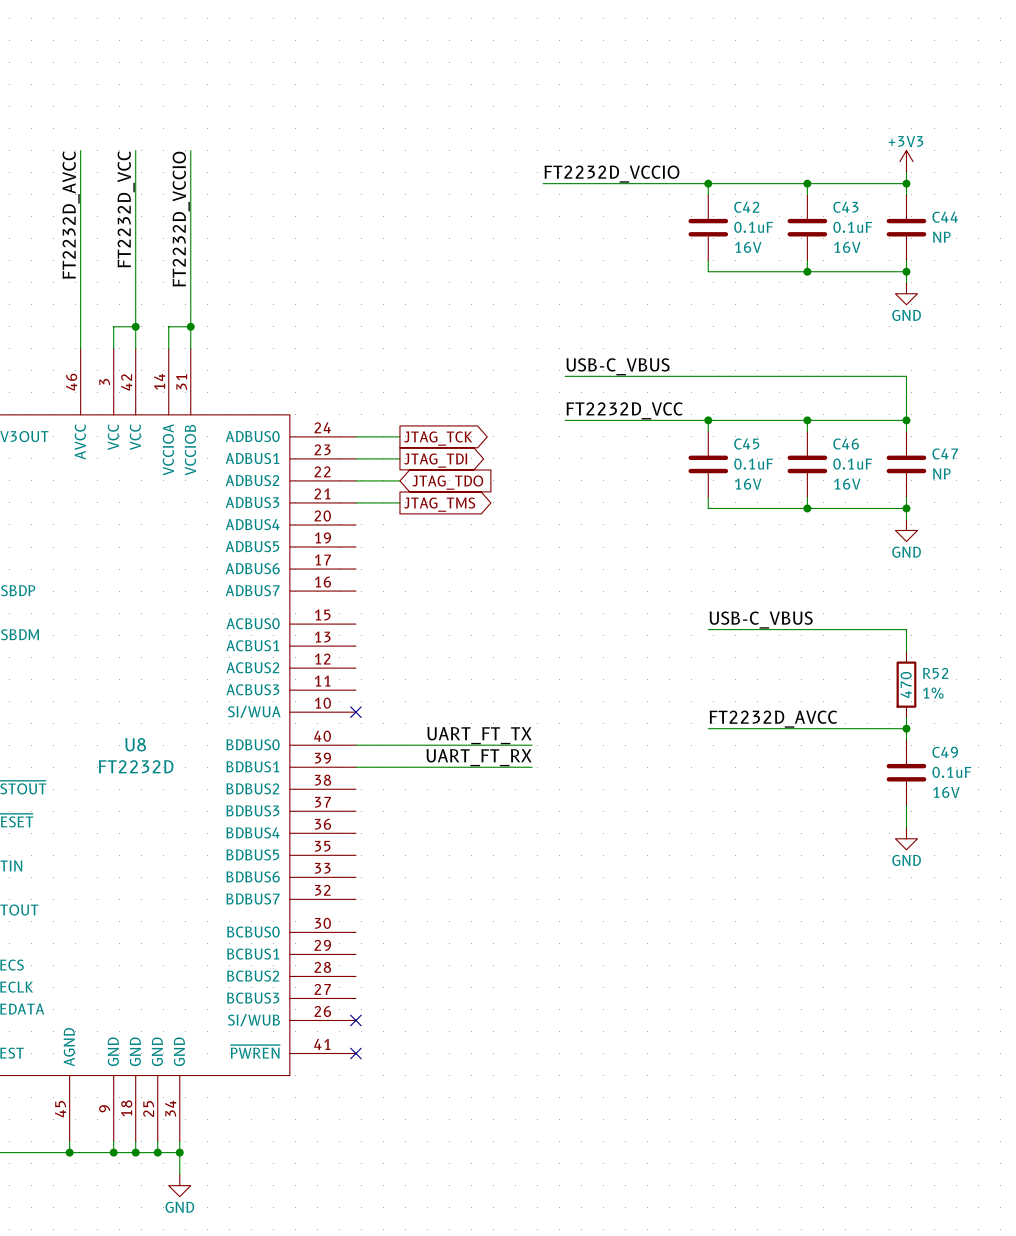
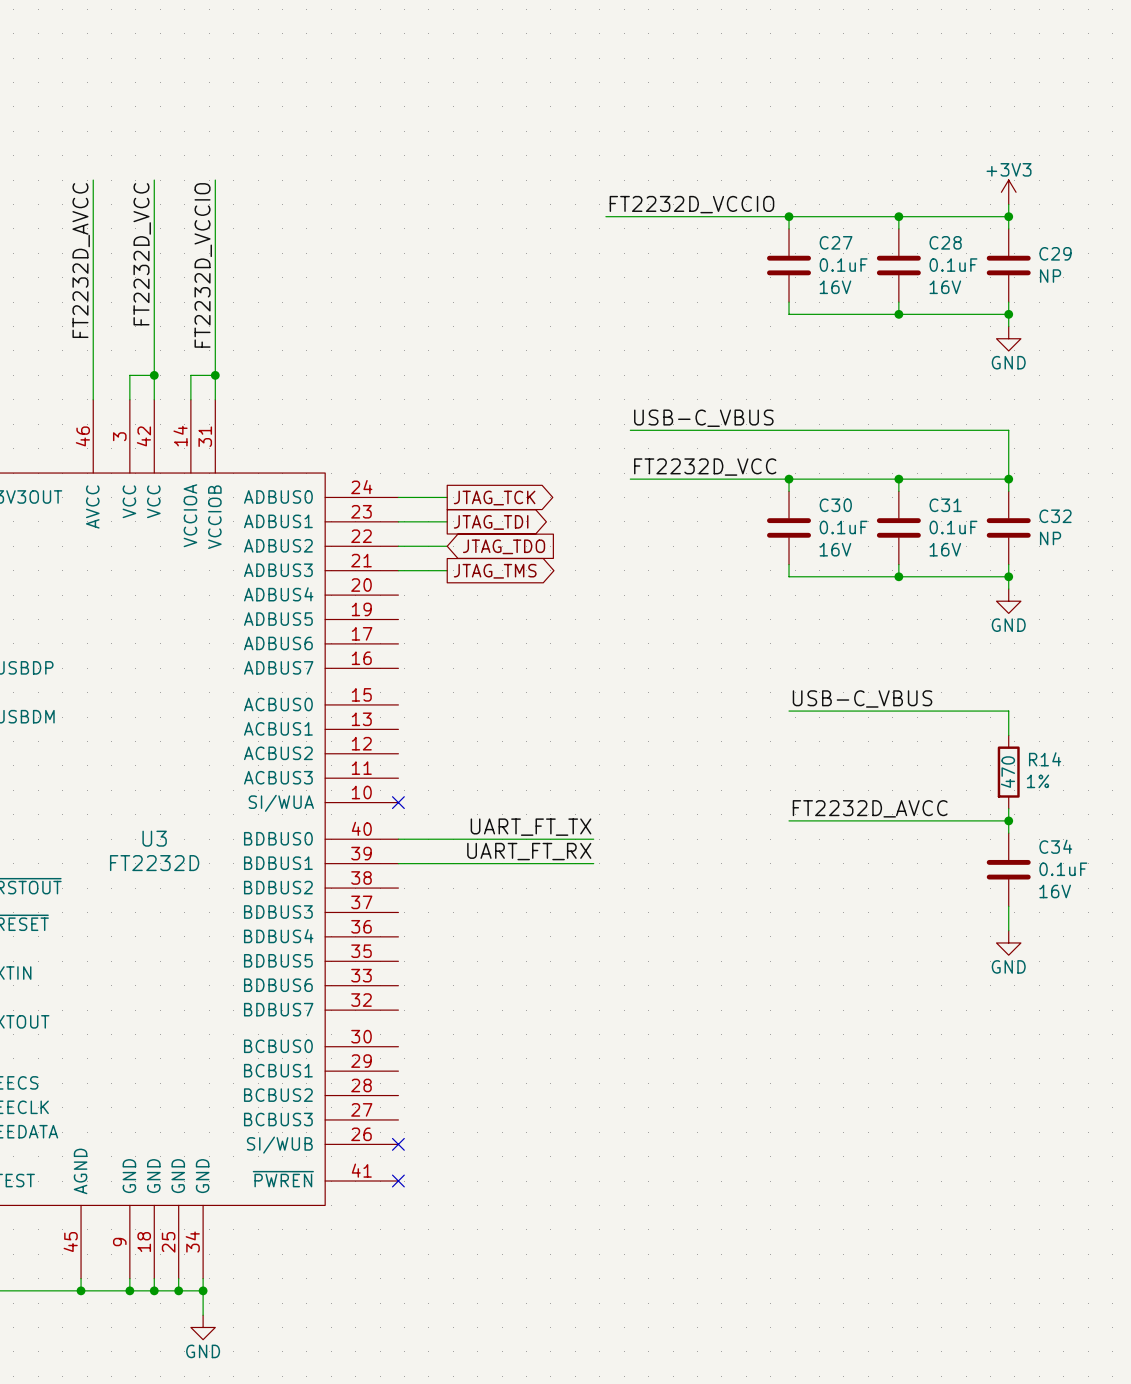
C42 name: C42 (746, 207) -> C27 (836, 242)
C43 name: C43 (845, 207) -> C28 (945, 242)
C44 name: C44 (945, 217) -> C29 (1055, 253)
C45 name: C45 (746, 444) -> C30 (835, 505)
C46 name: C46 (846, 444) -> C31 (945, 505)
C47 name: C47 (945, 453) -> C32 (1055, 516)
R52 name: R52 (935, 673) -> R14 (1045, 759)
U8 name: U8 (135, 744) -> U3 (154, 838)
C49 name: C49 (945, 752) -> C34 (1055, 846)

